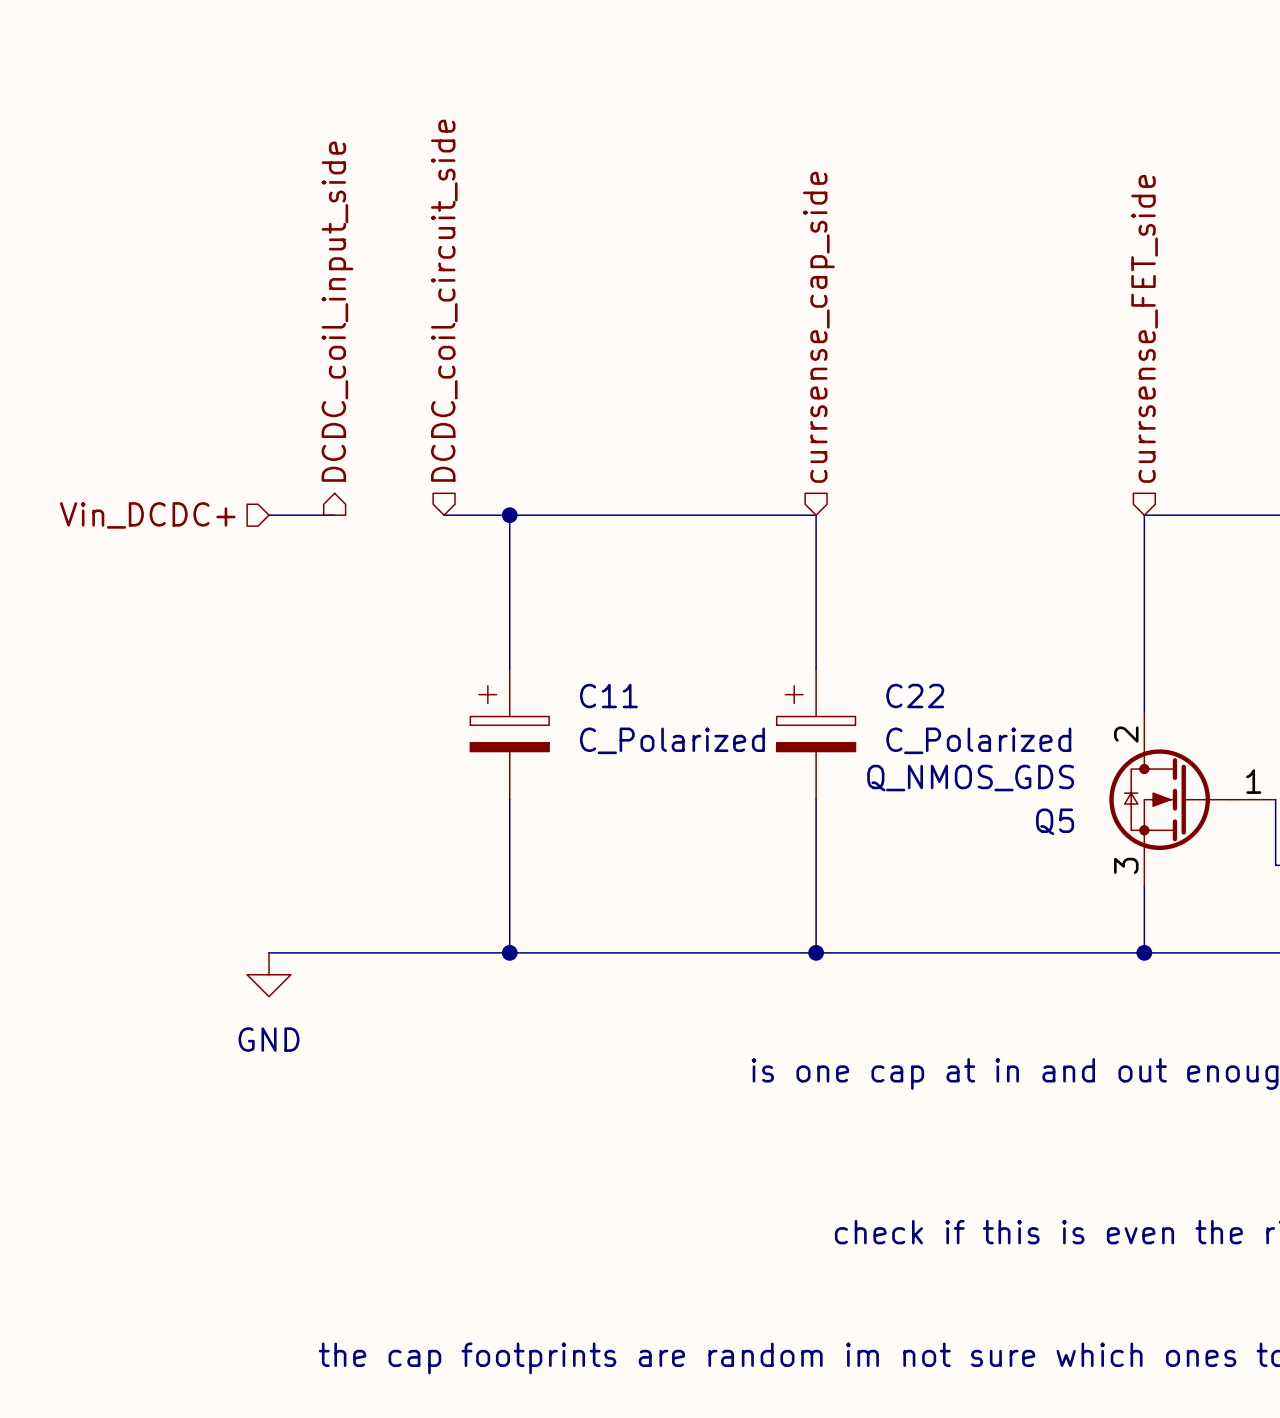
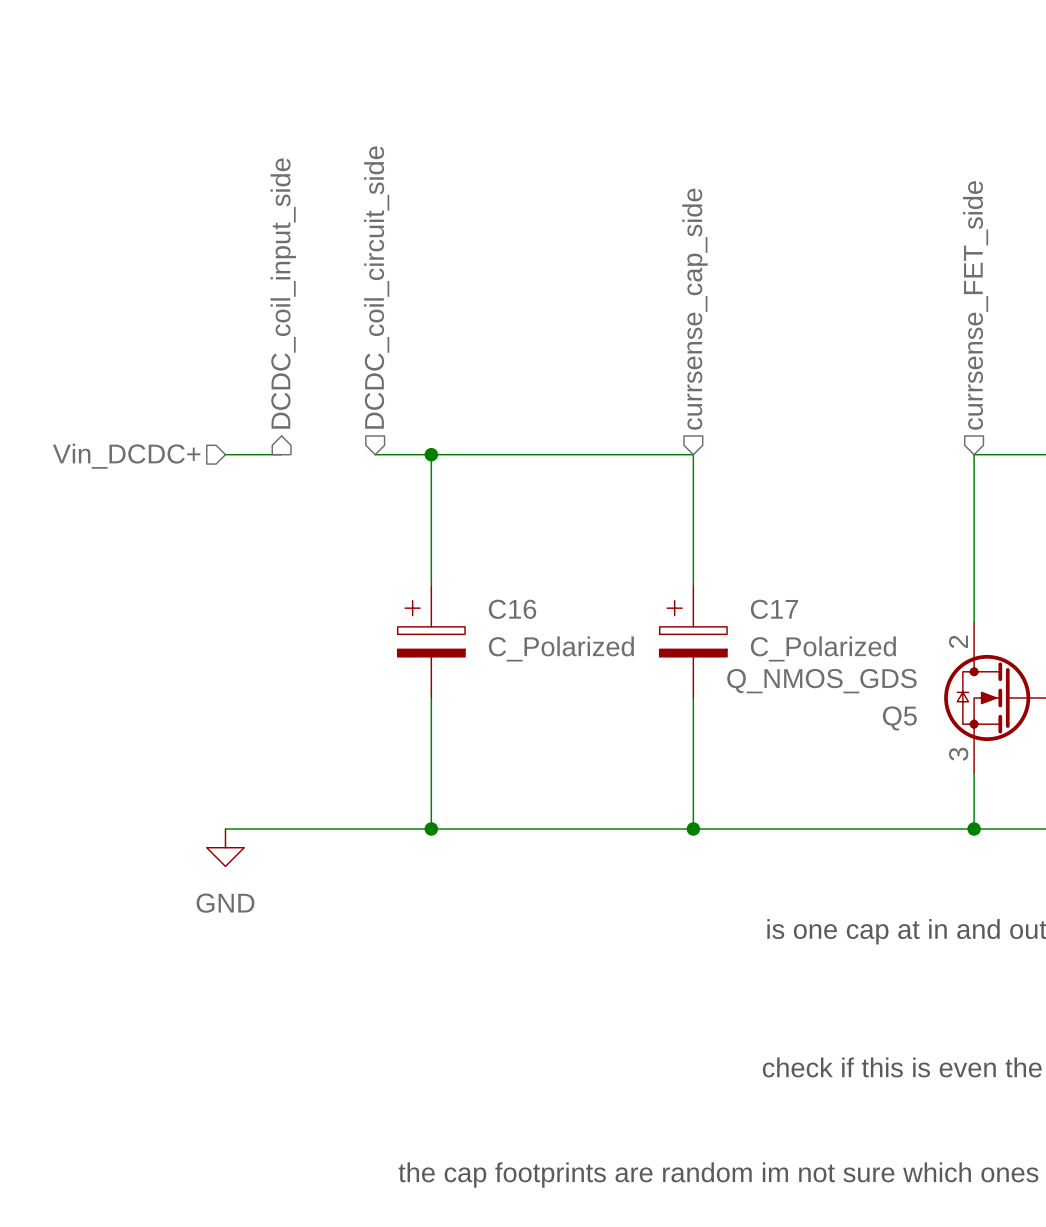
C11 name: C11 (608, 696) -> C16 (512, 609)
C22 name: C22 (915, 696) -> C17 (774, 609)

